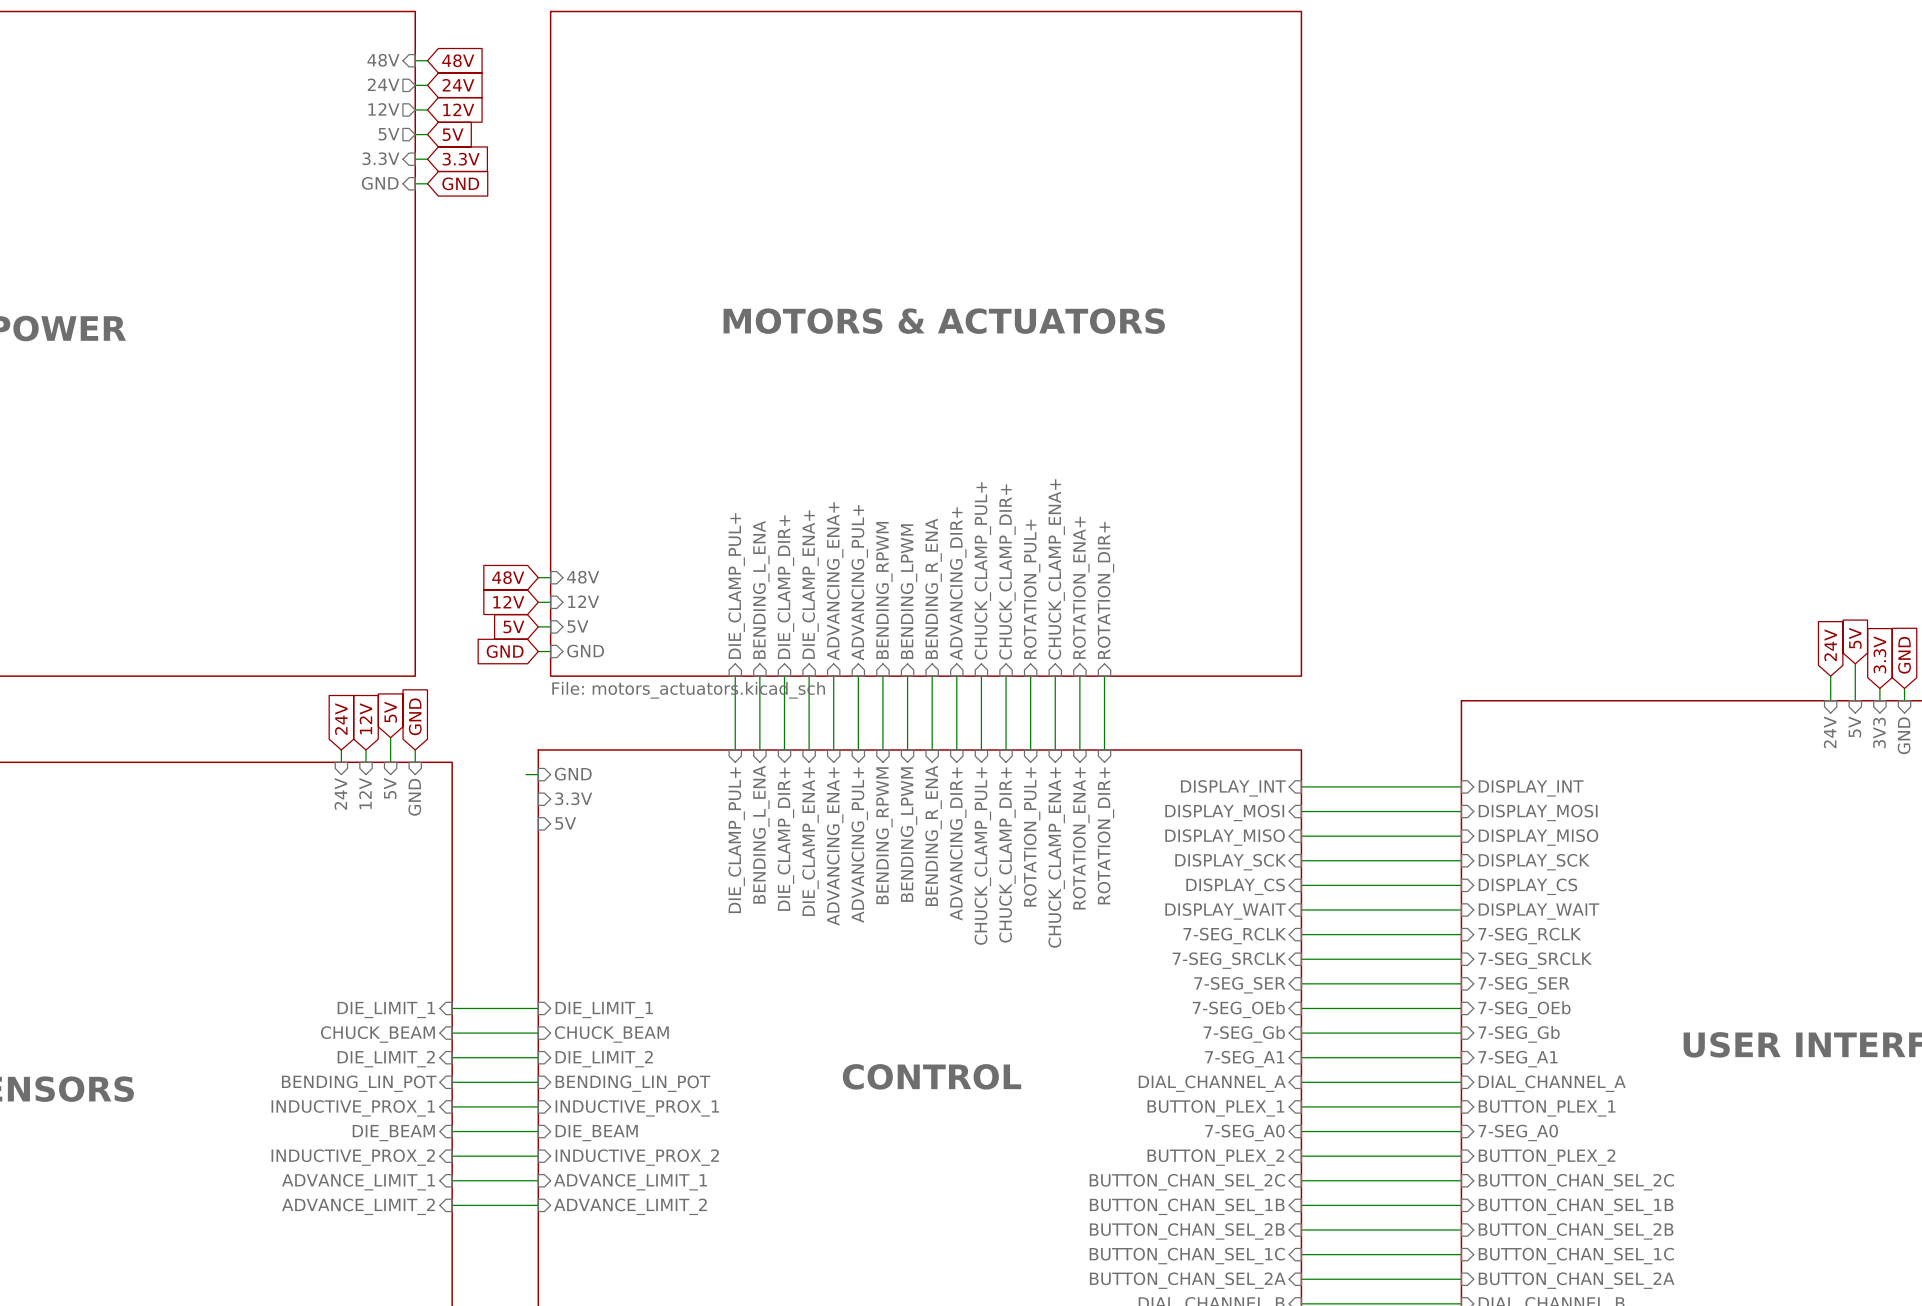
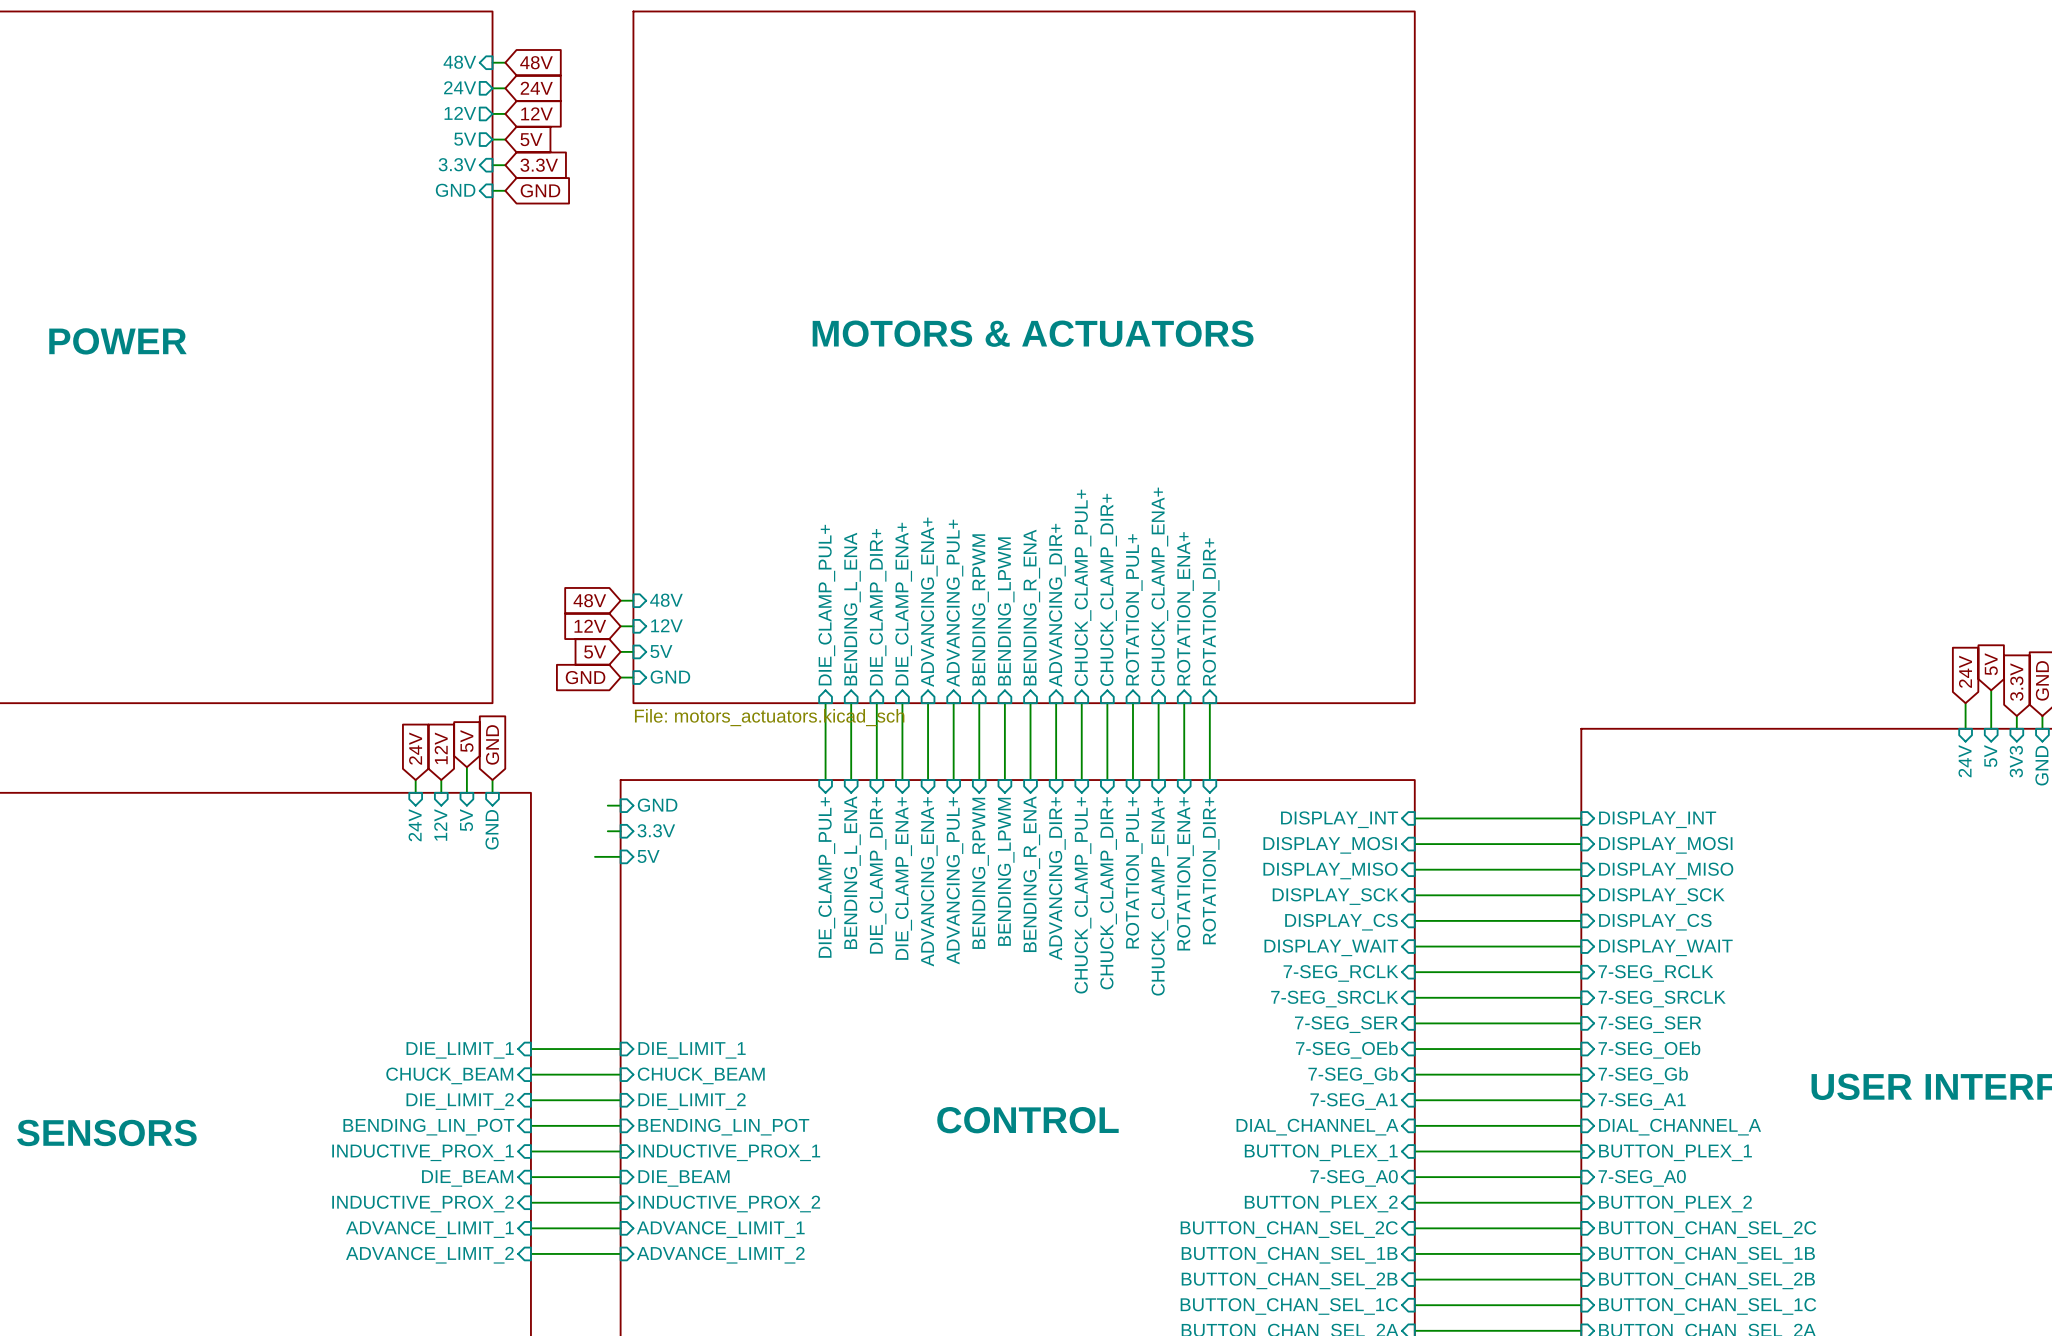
wire: none -> (607, 831) (620, 831)
wire: none -> (595, 856) (620, 856)

